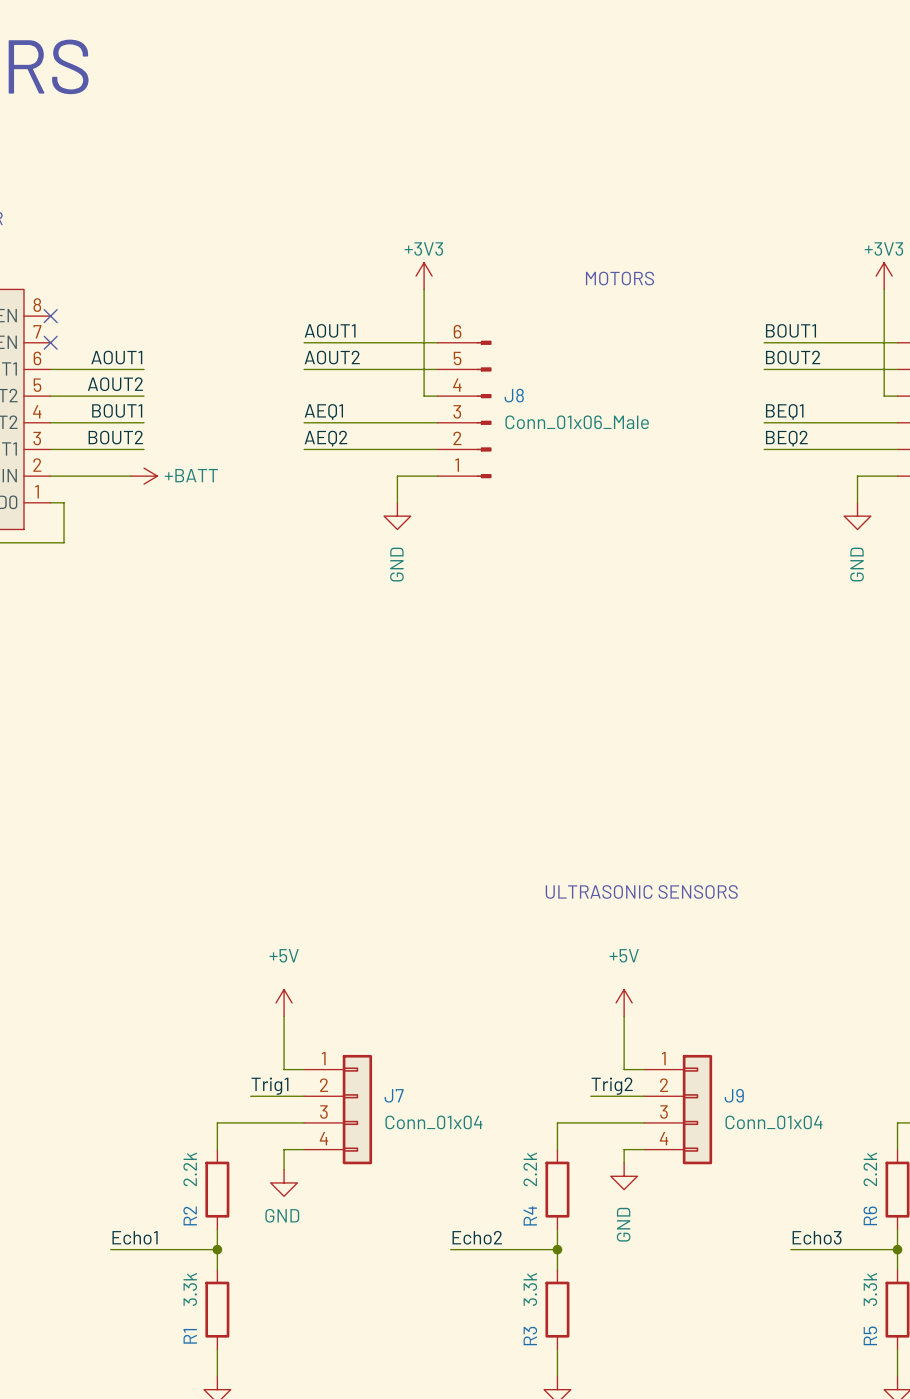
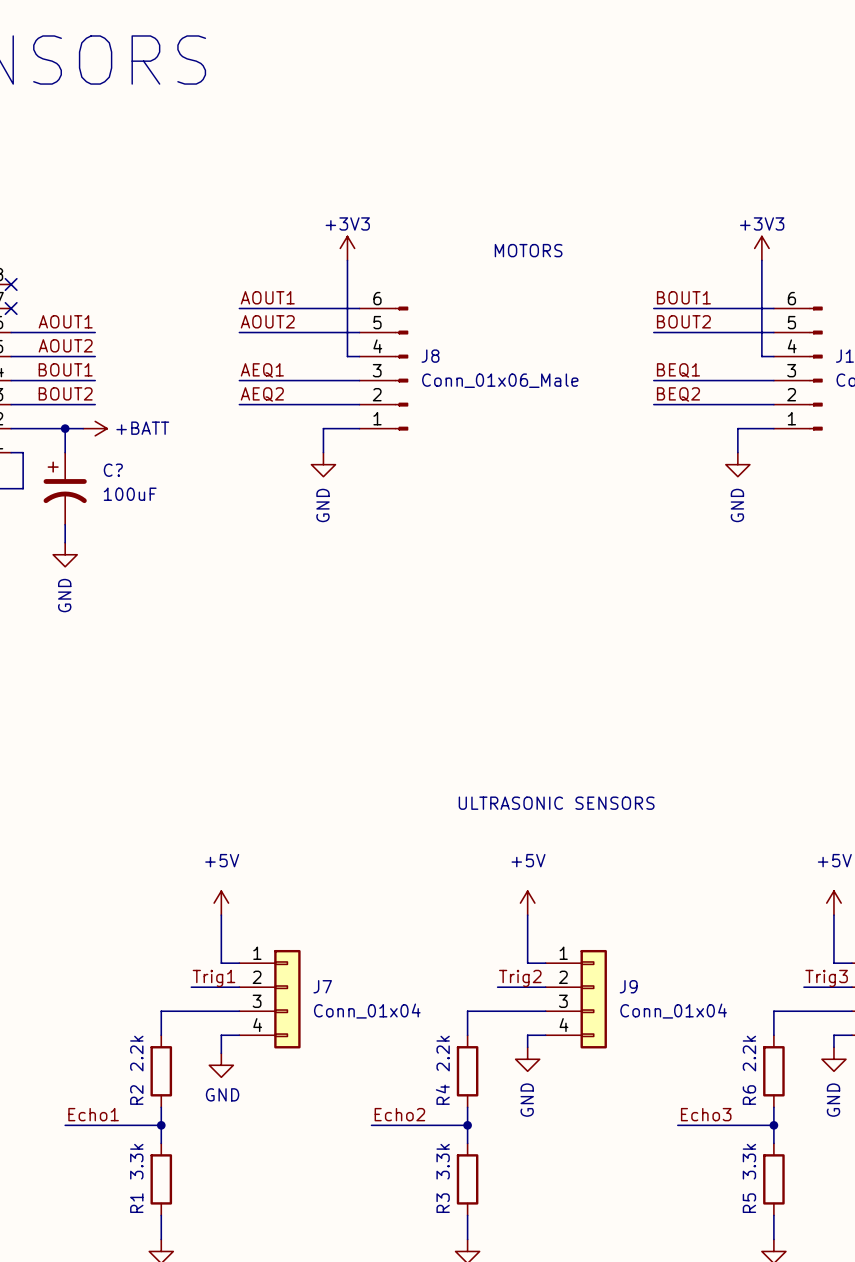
wire: none -> (65, 428) (65, 452)
junction: none -> (65, 428)
C?: none -> 100uF (65, 488)
wire: none -> (65, 524) (65, 542)
power symbol: none -> GND (65, 554)

